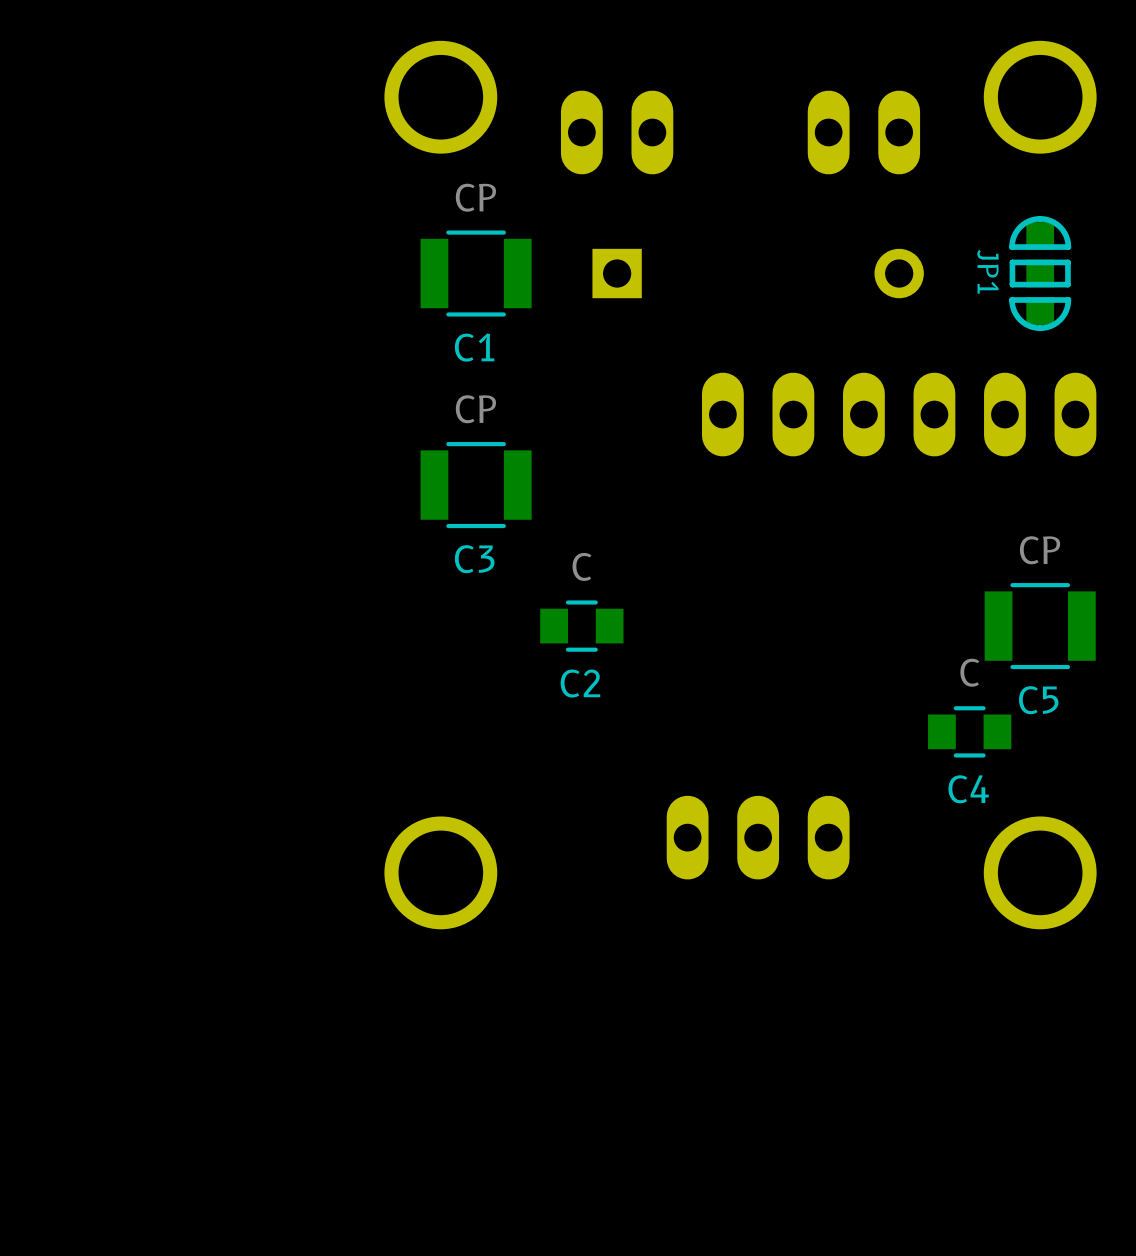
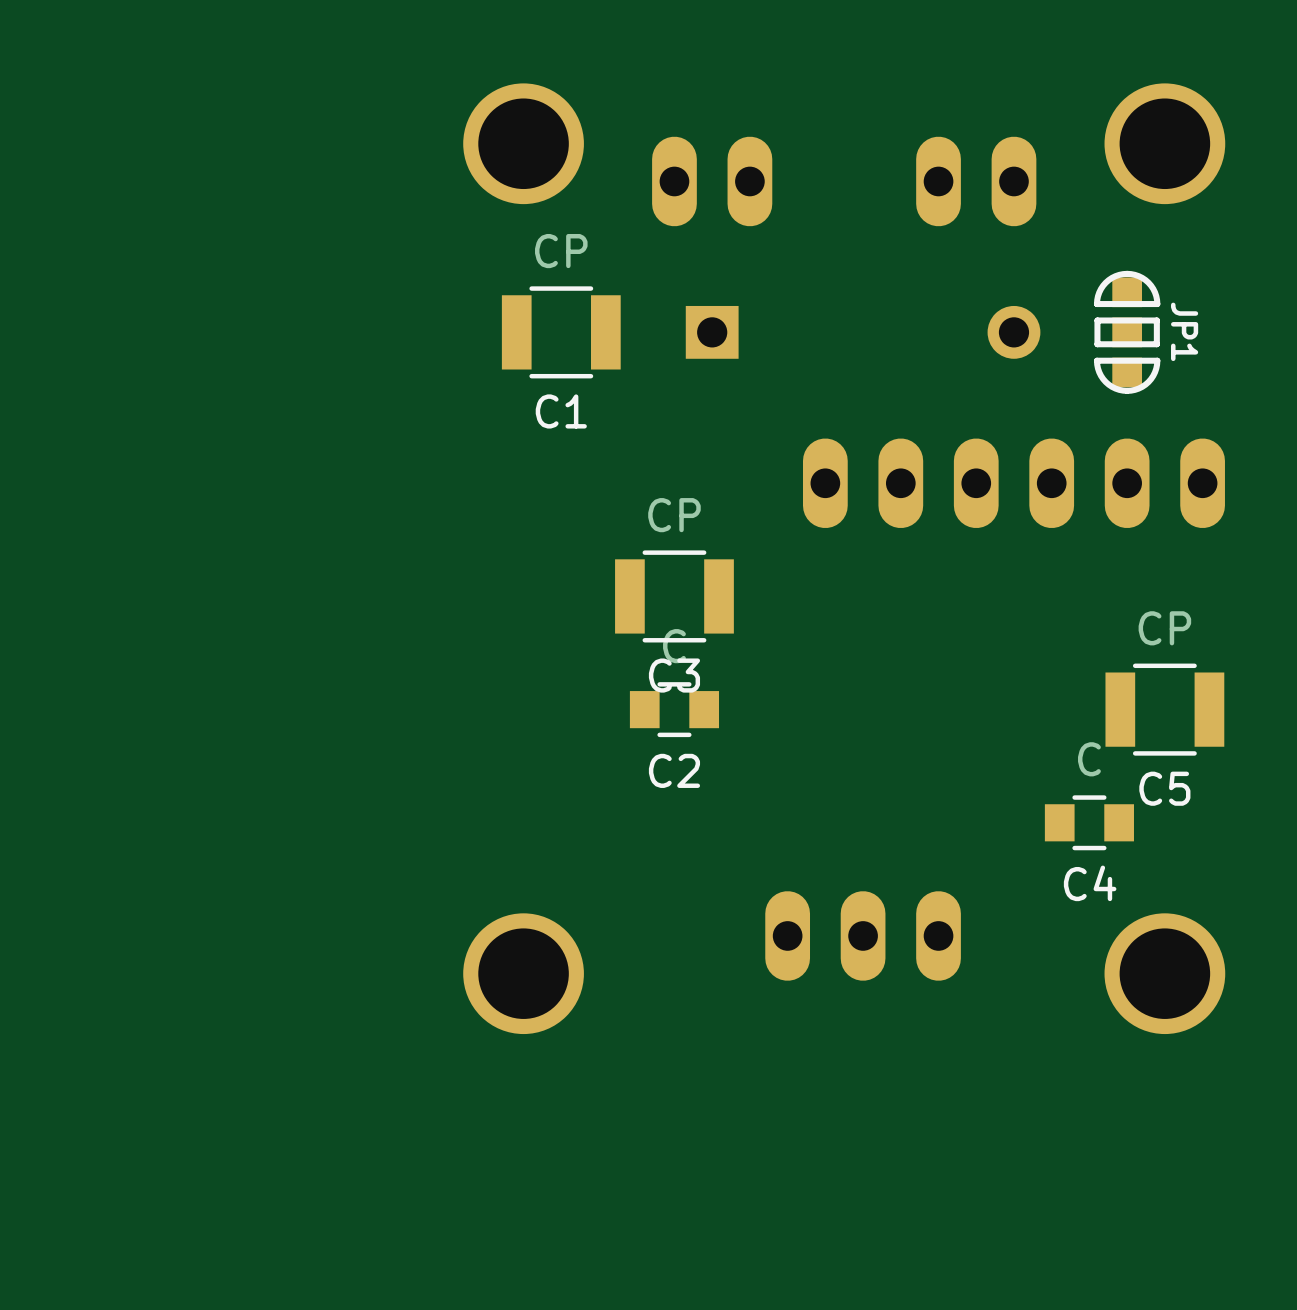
JP1 name position: JP1 (987, 271) -> JP1 (1184, 331)
JP1 position: (1040, 273) -> (1127, 332)
C3 position: (476, 485) -> (674, 596)

